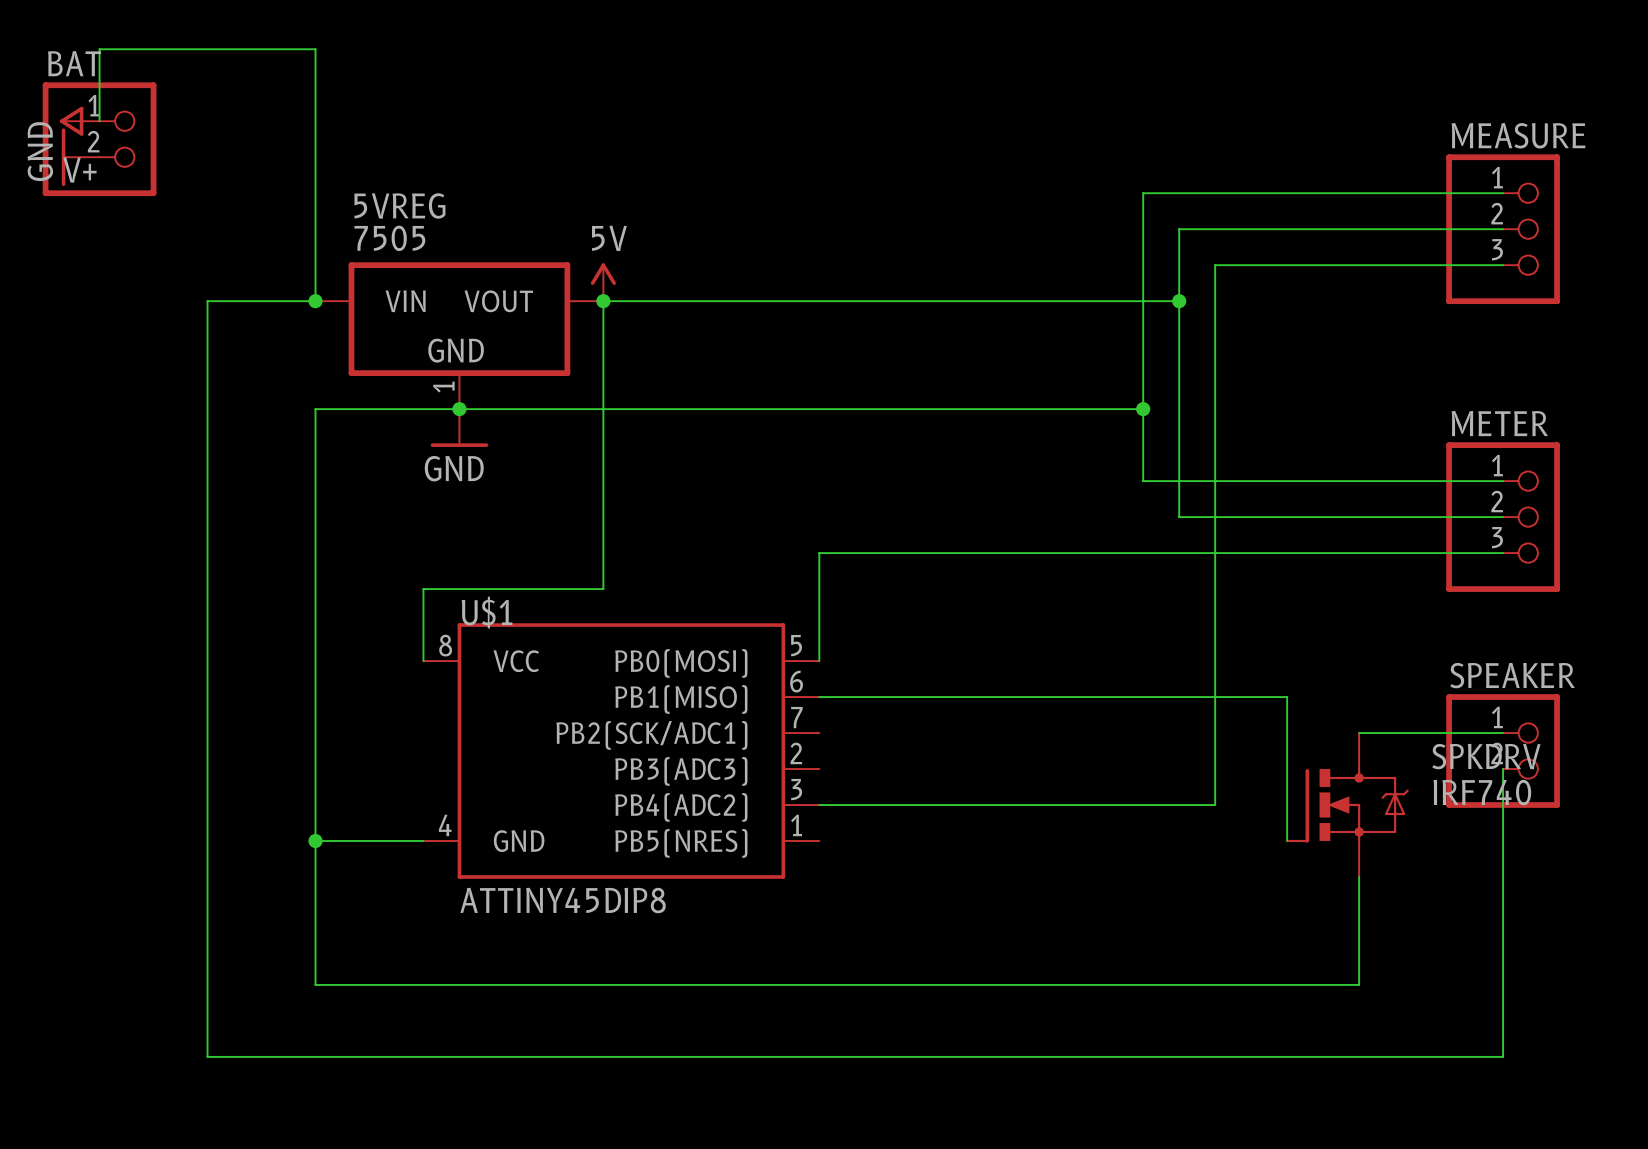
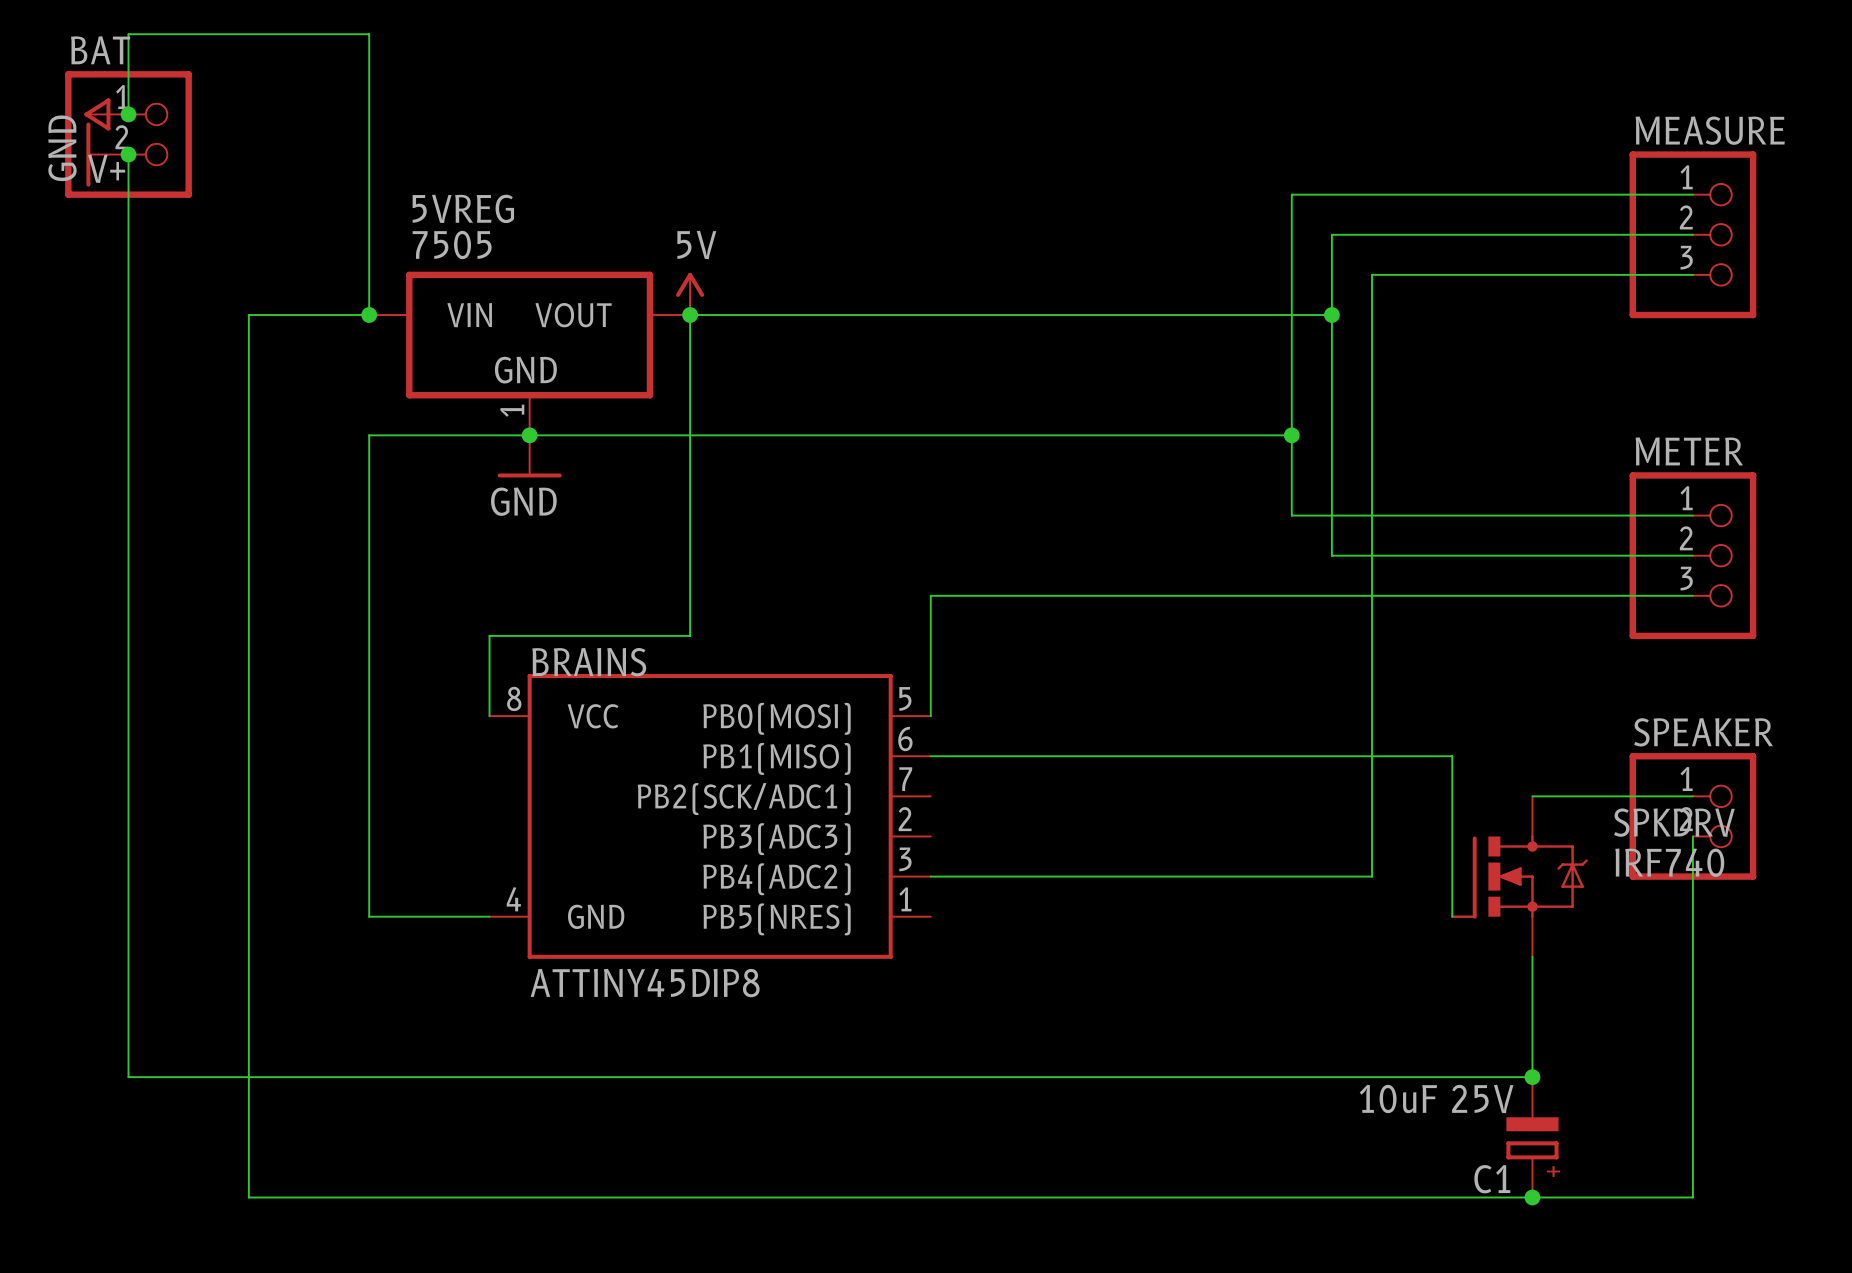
junction: none -> (128, 114)
junction: none -> (128, 154)
U$1 name: U$1 (487, 612) -> BRAINS (589, 662)
wire: (315, 840) (315, 984) -> (128, 154) (128, 1077) (369, 1077)
junction: (315, 840) -> none
junction: none -> (1532, 1077)
C1: none -> 10uF 25V (1532, 1137)
wire: (207, 1056) (1503, 1056) -> (248, 1157) (248, 1197) (1692, 1197) (1692, 1157)
junction: none -> (1532, 1197)

